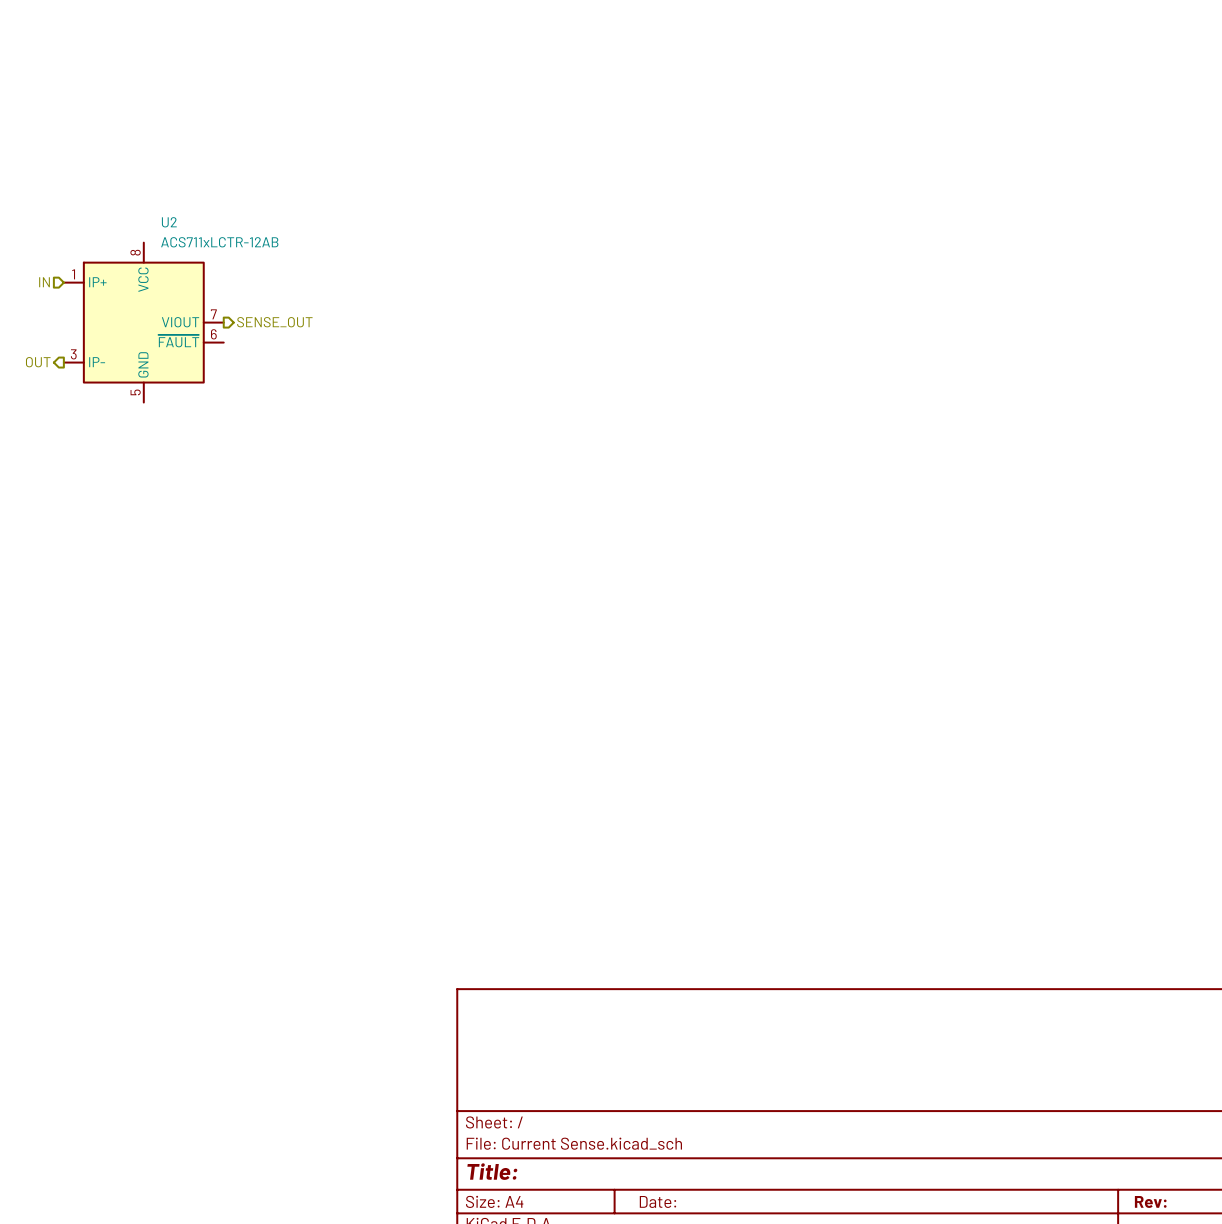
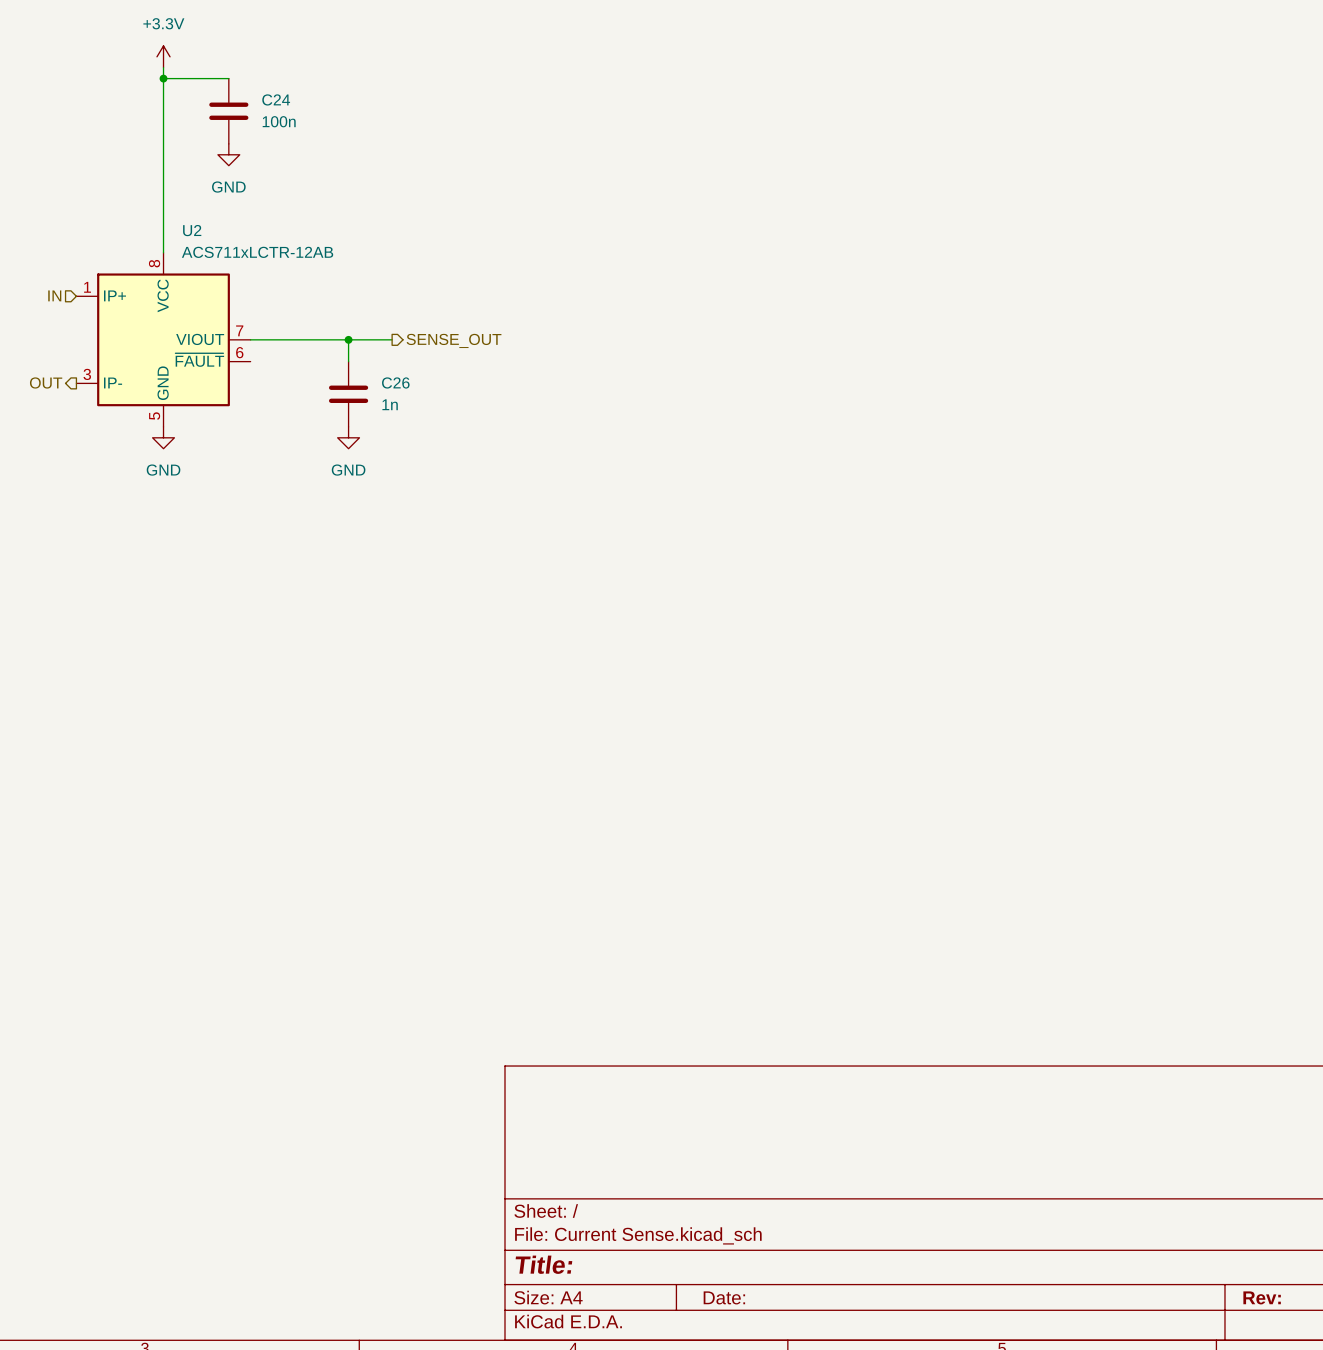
power symbol: none -> +3.3V (163, 56)
wire: none -> (163, 67) (163, 252)
wire: none -> (163, 78) (228, 78)
junction: none -> (163, 78)
C24: none -> 100n (228, 111)
power symbol: none -> GND (228, 154)
wire: none -> (250, 339) (392, 339)
hierarchical label position: SENSE_OUT (274, 322) -> SENSE_OUT (454, 340)
wire: none -> (348, 339) (348, 361)
junction: none -> (348, 339)
C26: none -> 1n (348, 394)
power symbol: none -> GND (163, 437)
power symbol: none -> GND (348, 437)

